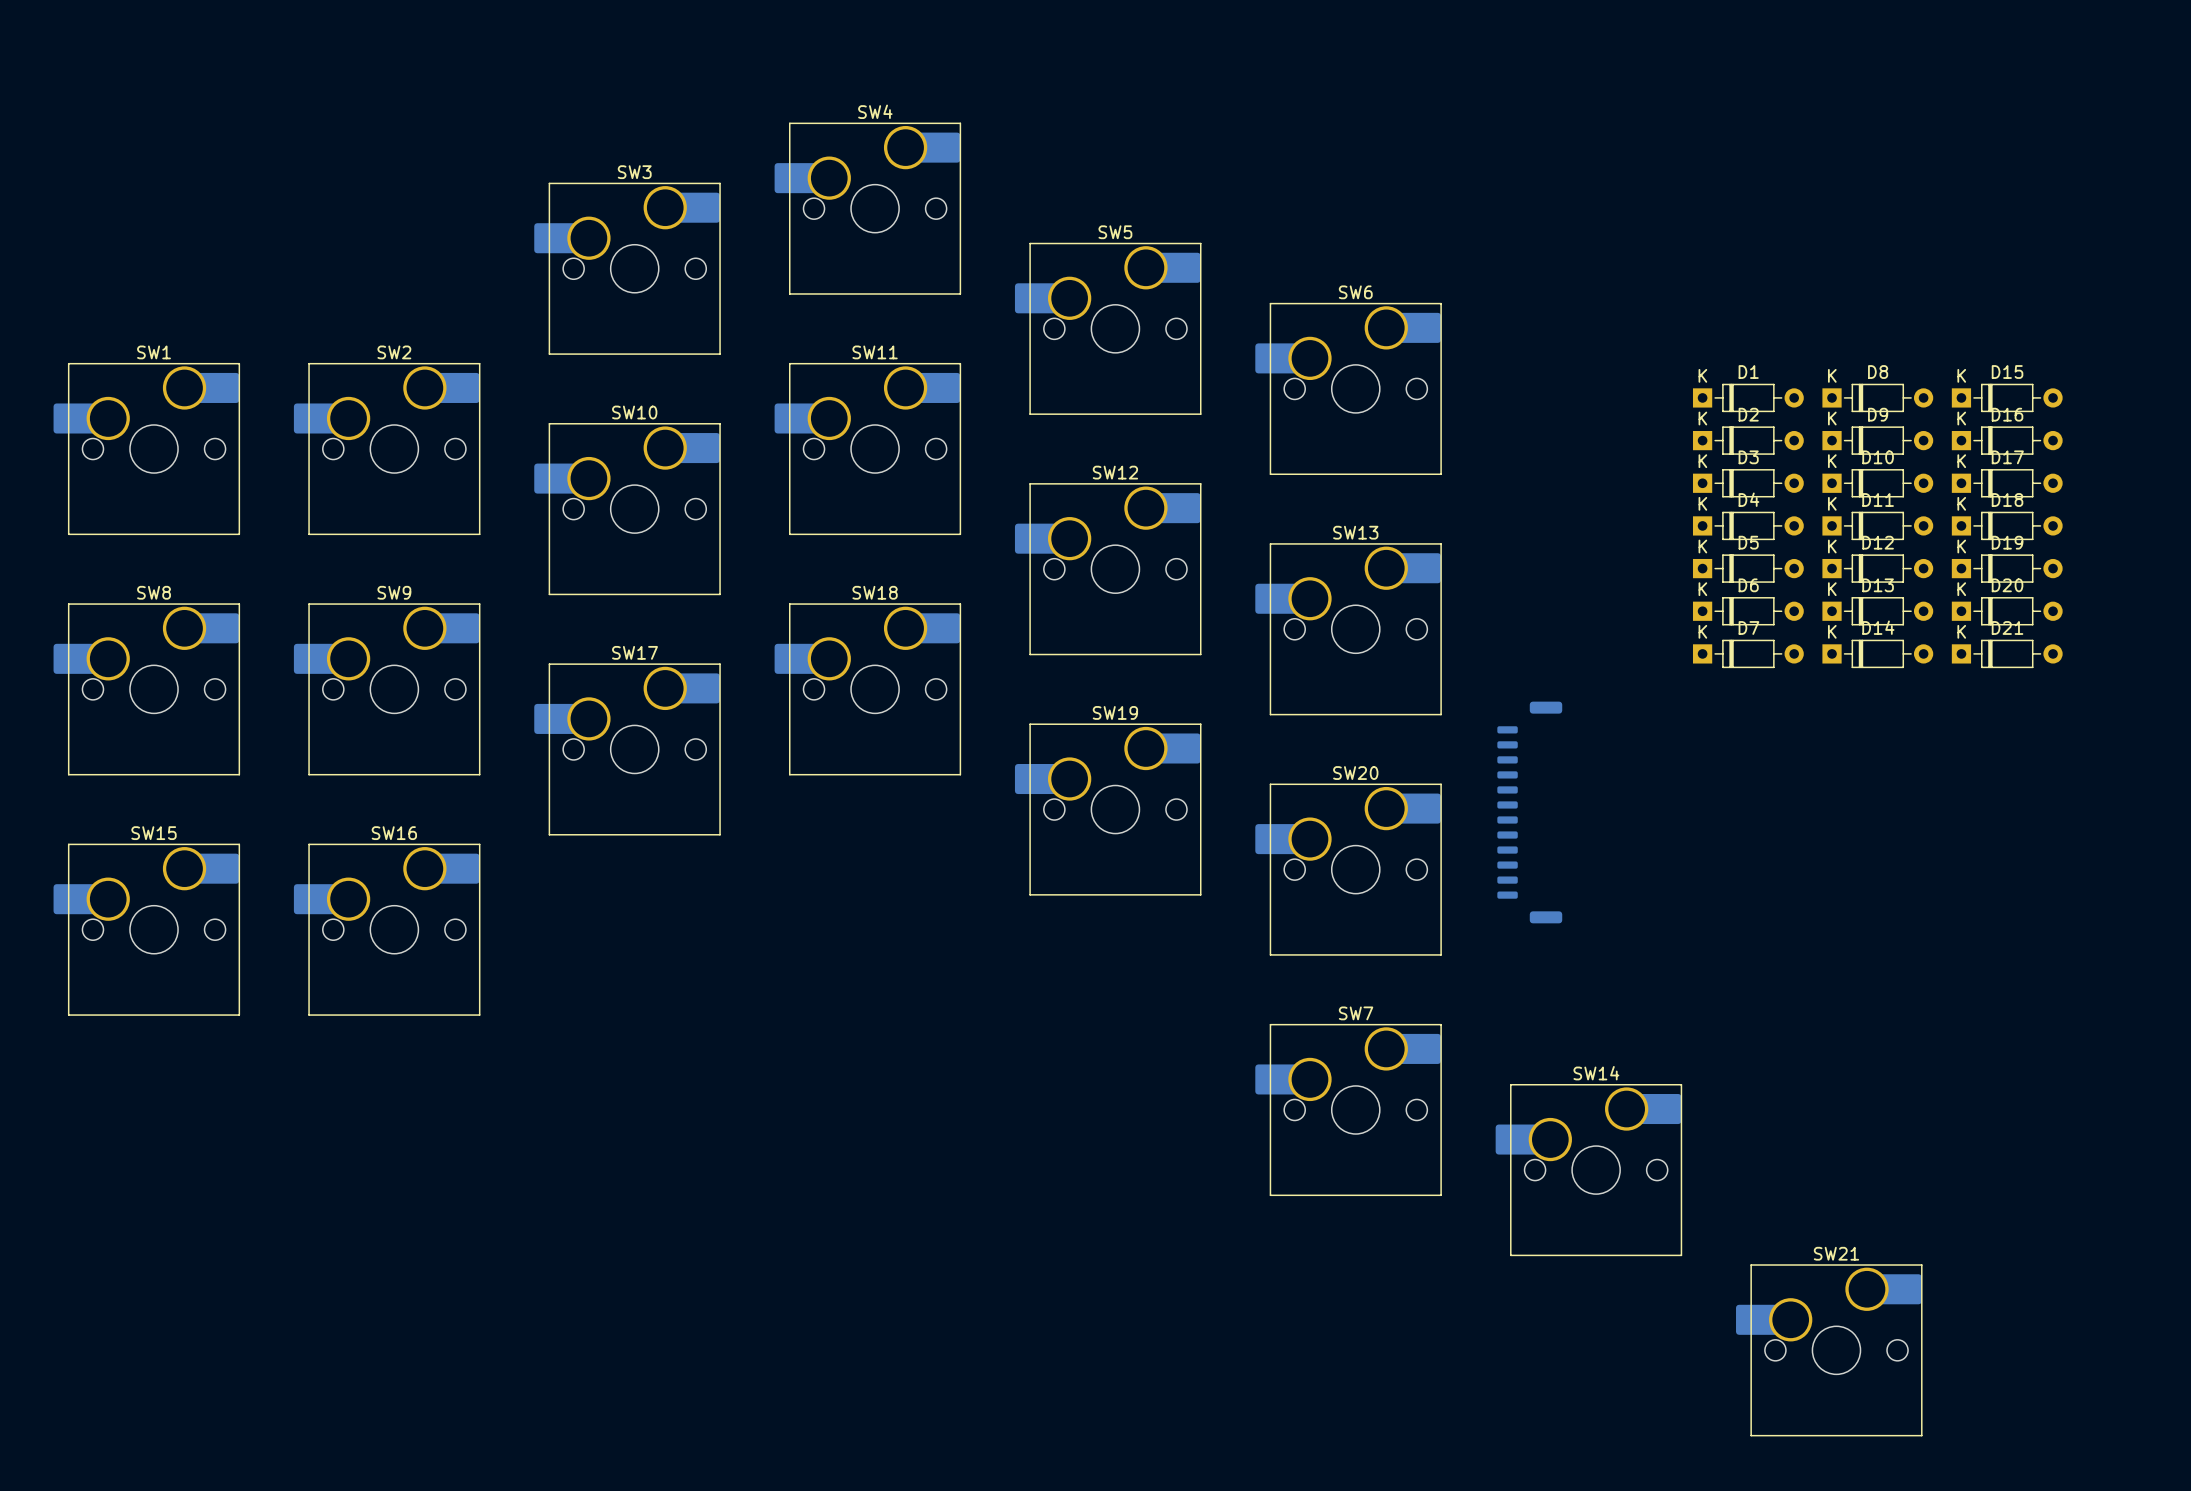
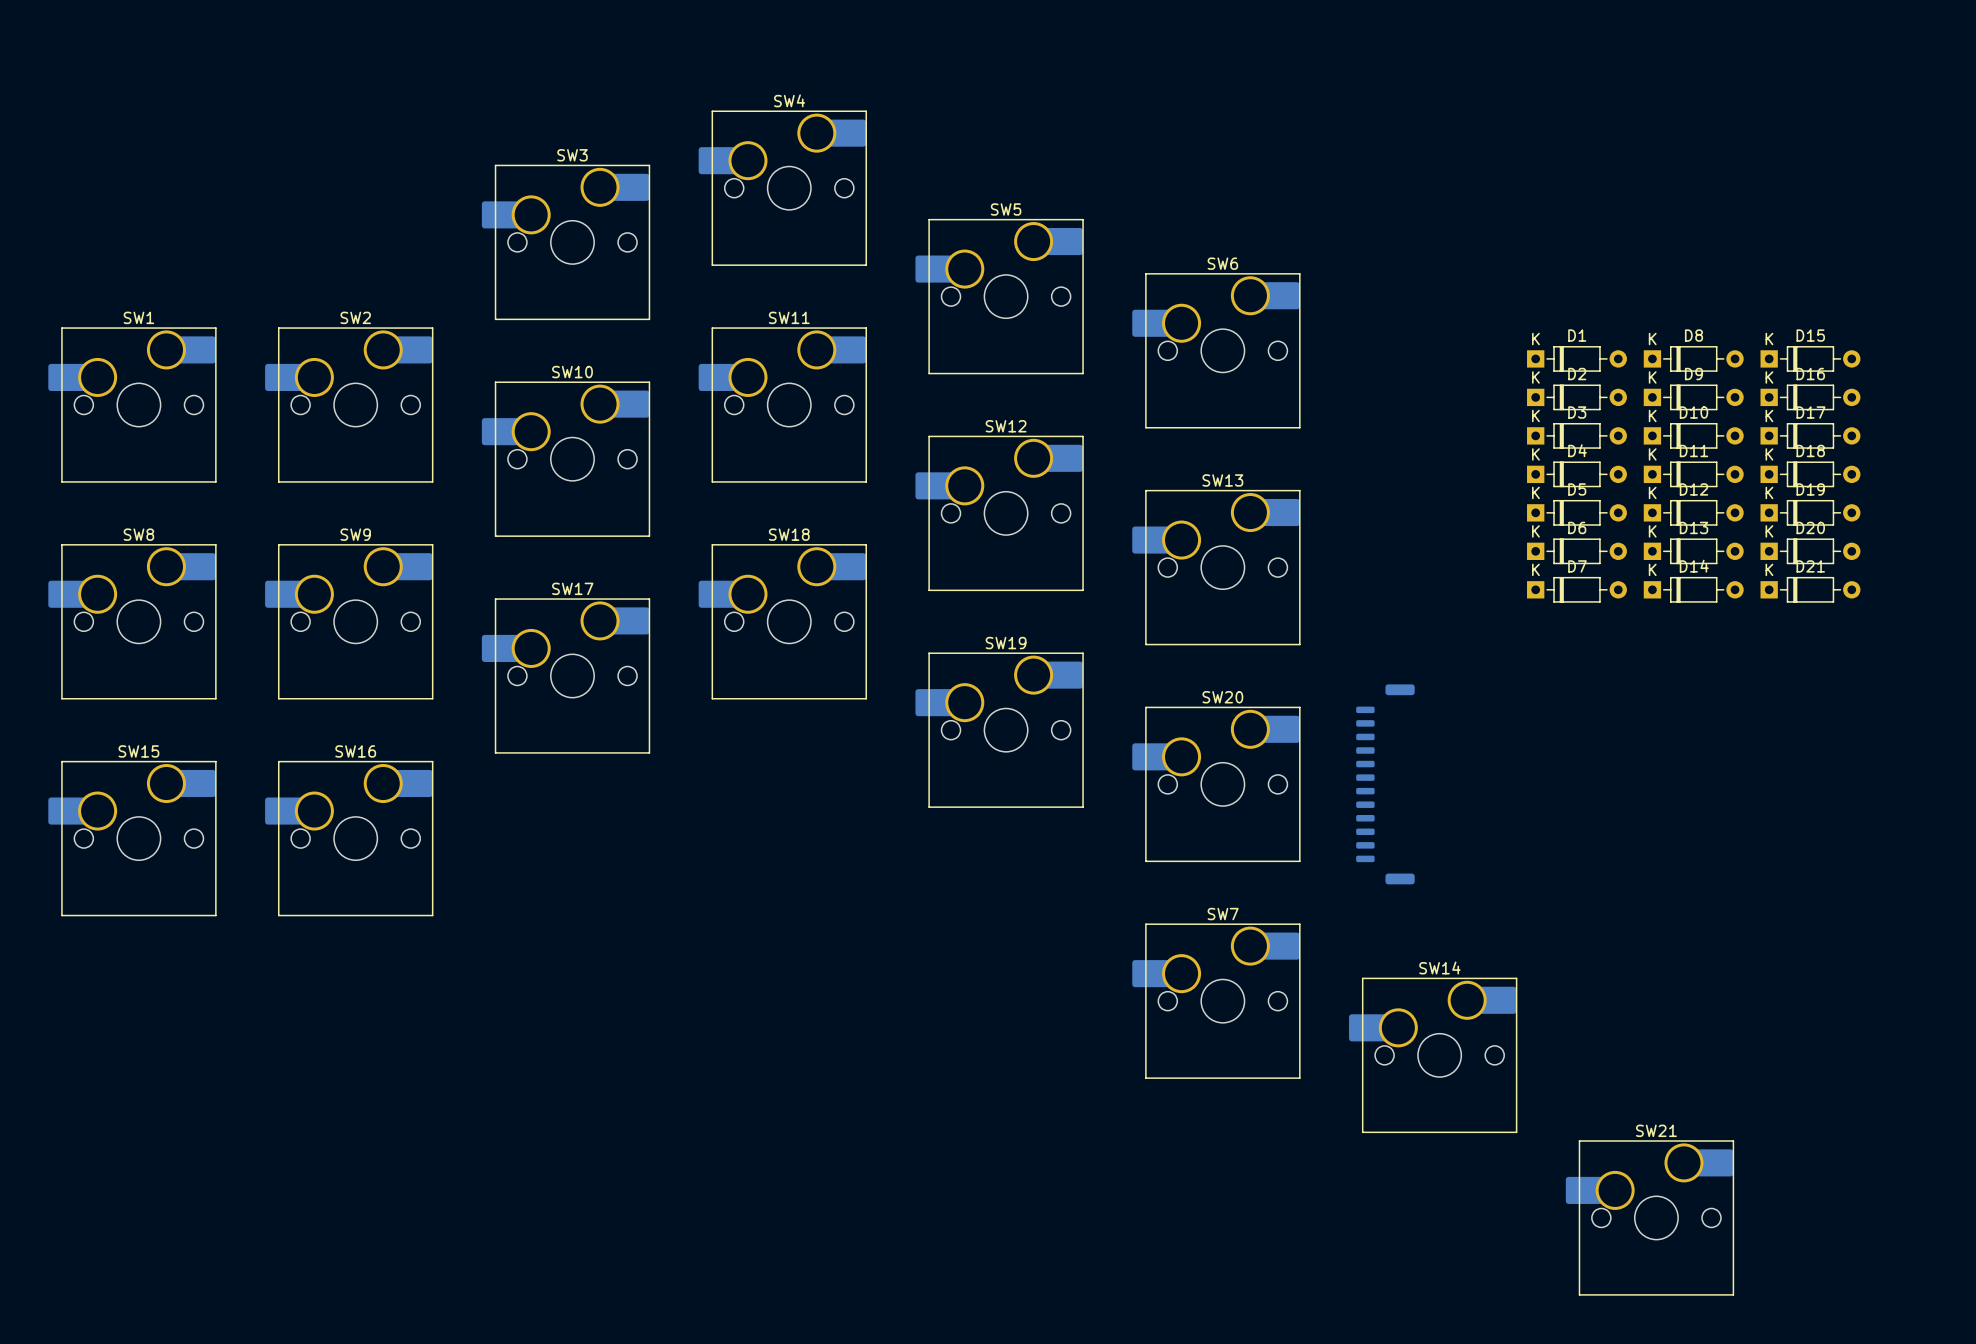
part position: (1529, 812) -> (1385, 784)

